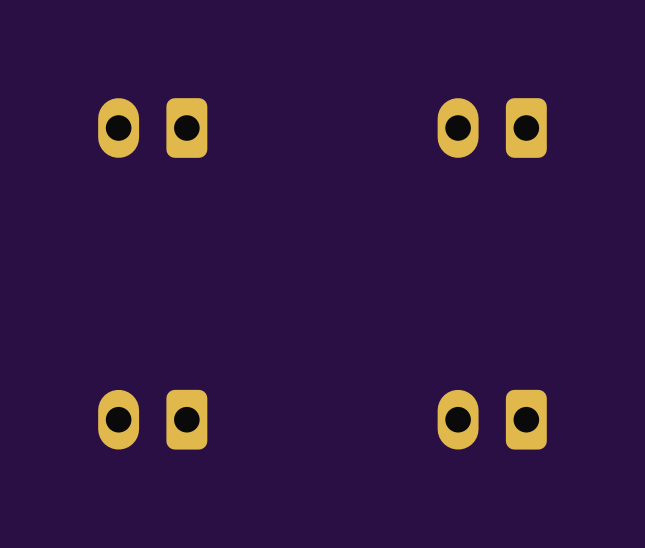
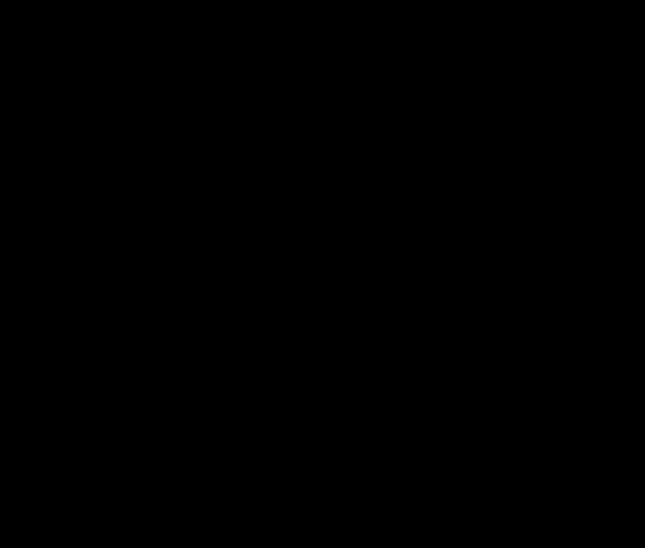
part: (152, 128) -> none
part: (492, 128) -> none
part: (152, 419) -> none
part: (492, 419) -> none

